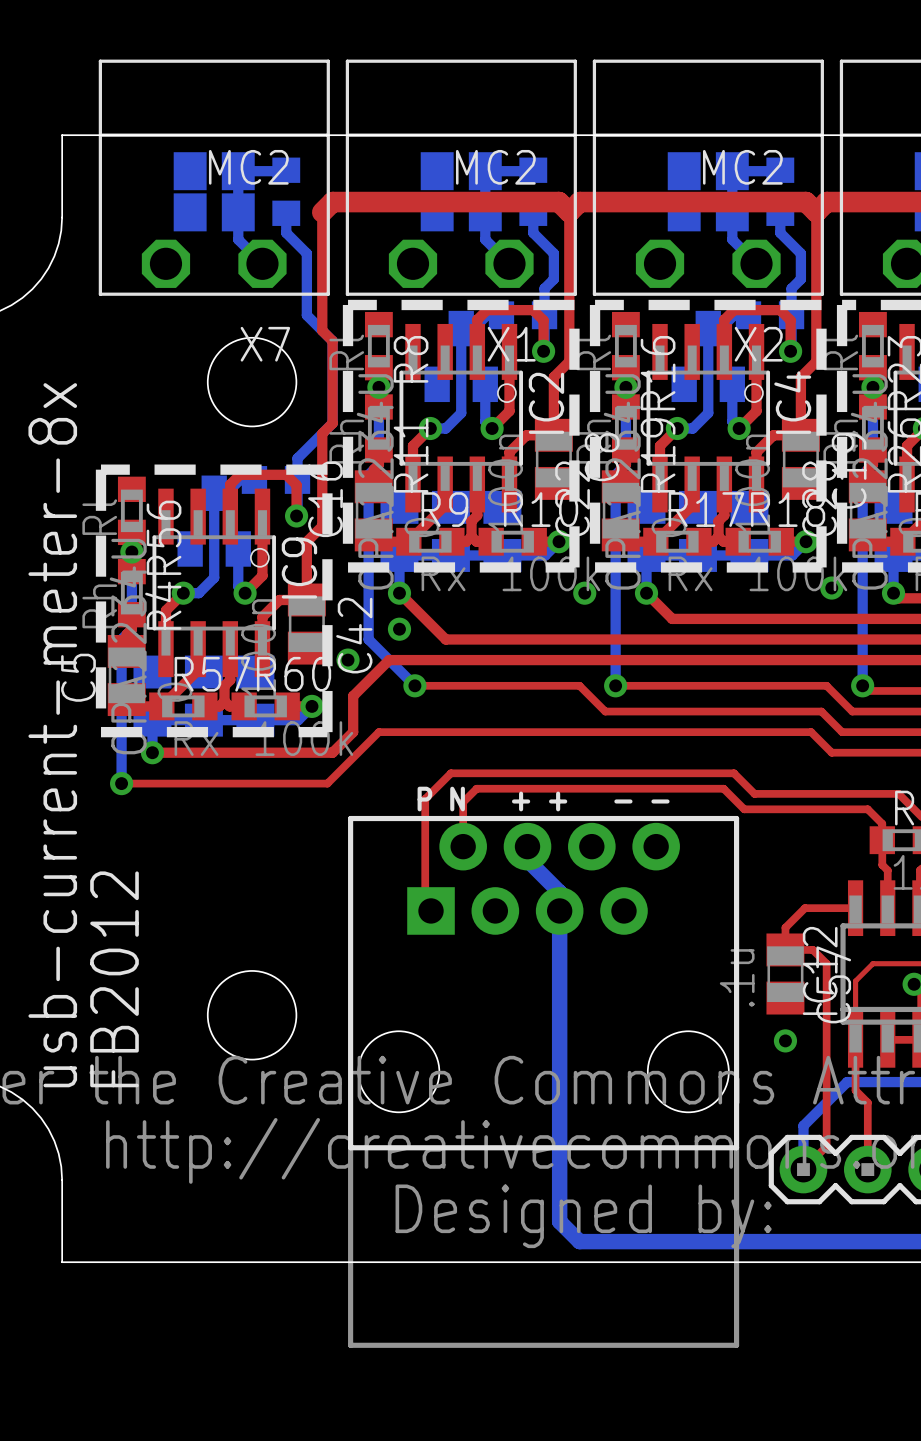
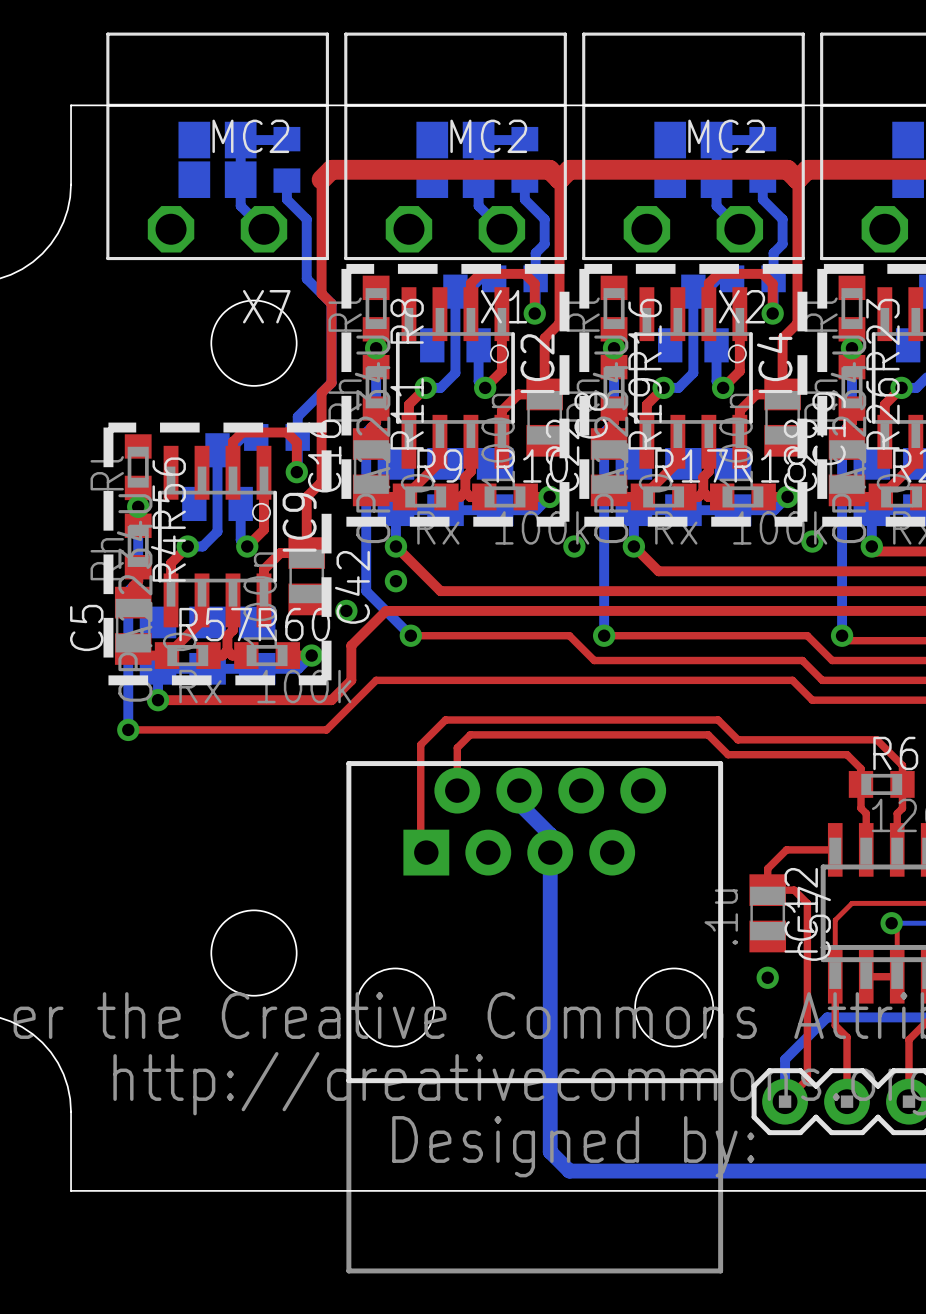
text: usb-current-meter-8x (52, 735) -> none
text: P N + + - - (543, 799) -> none
text: FB2012 (114, 979) -> none

